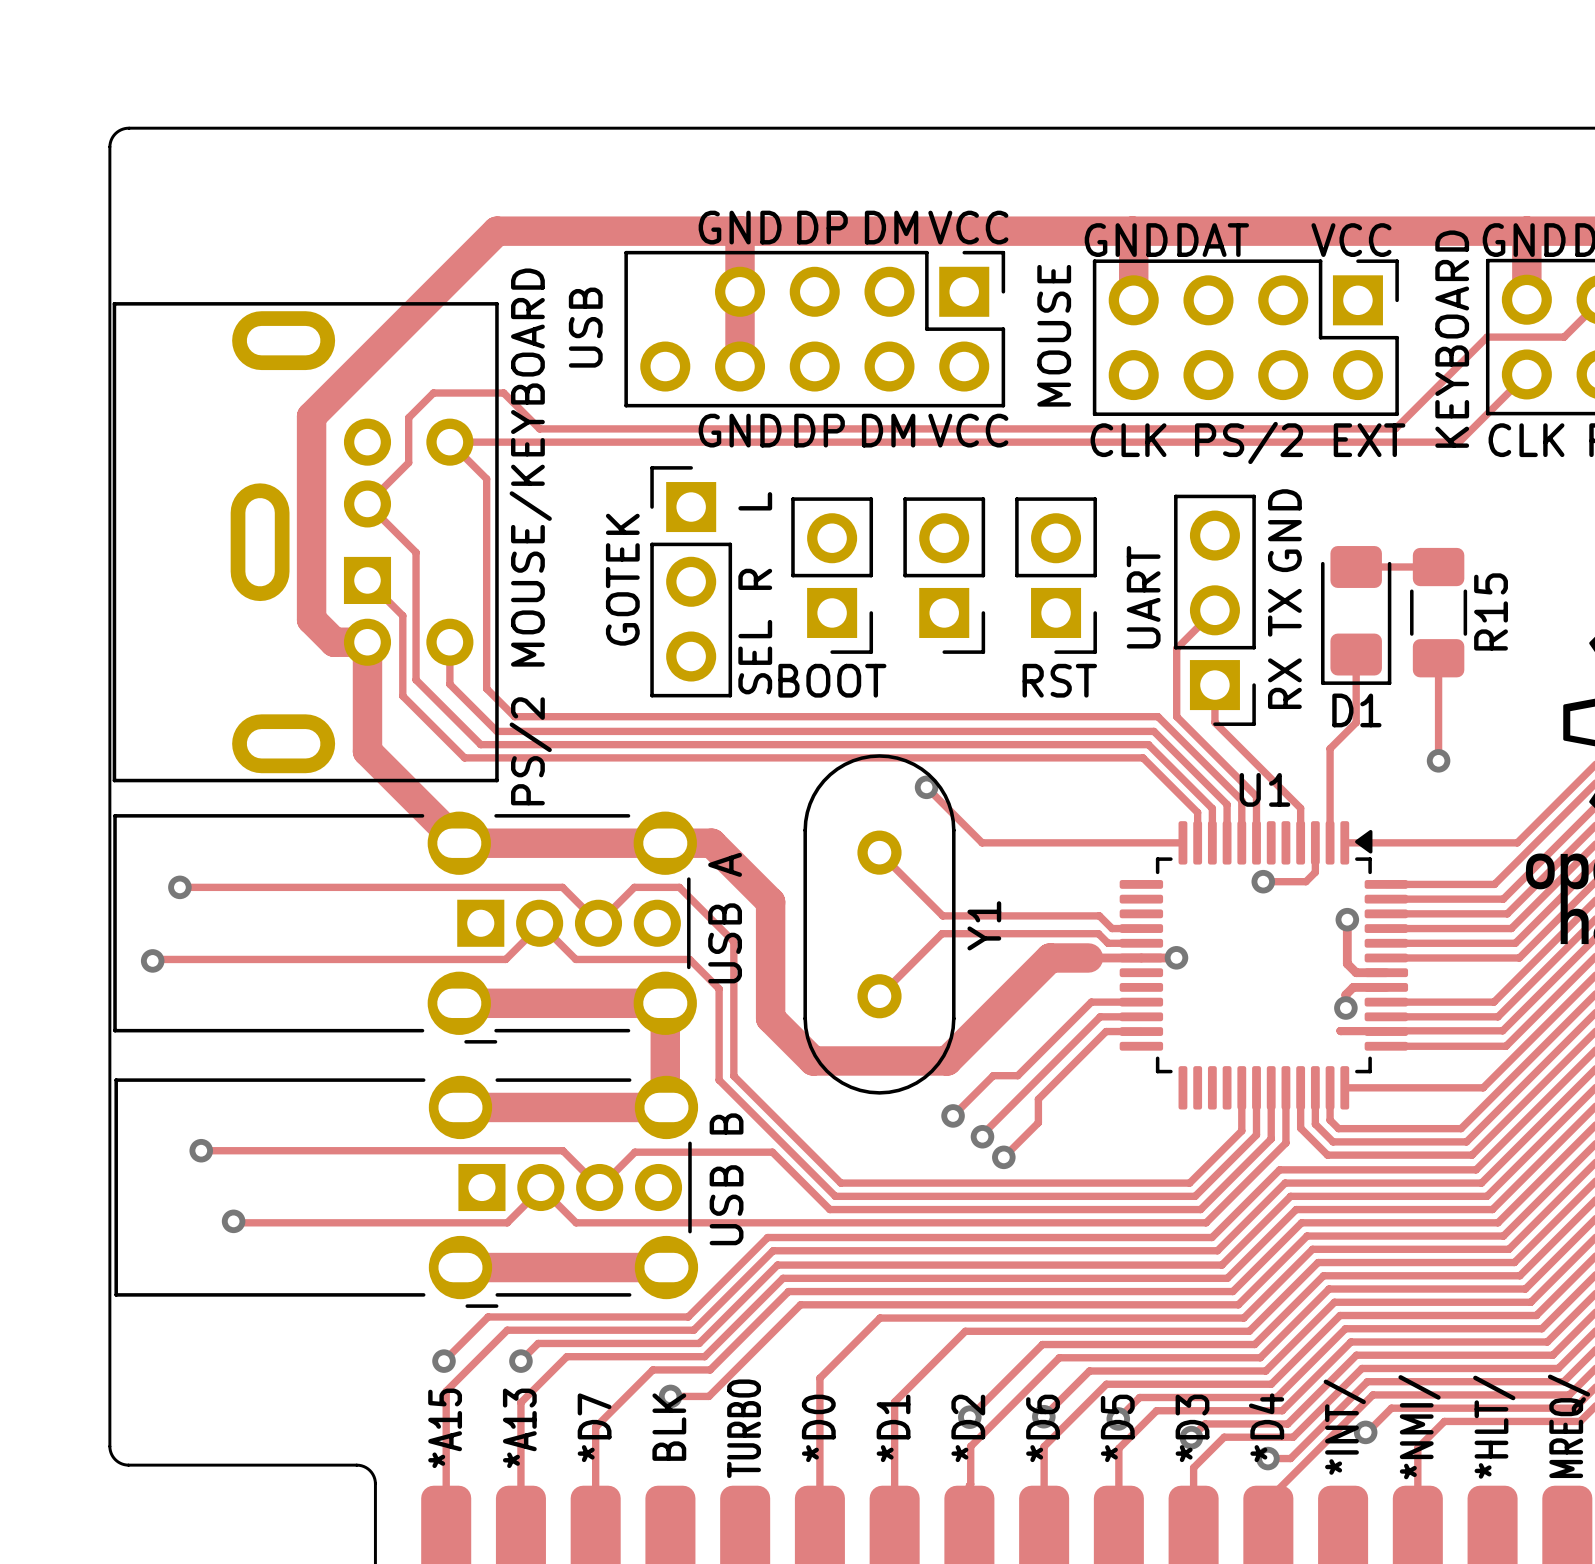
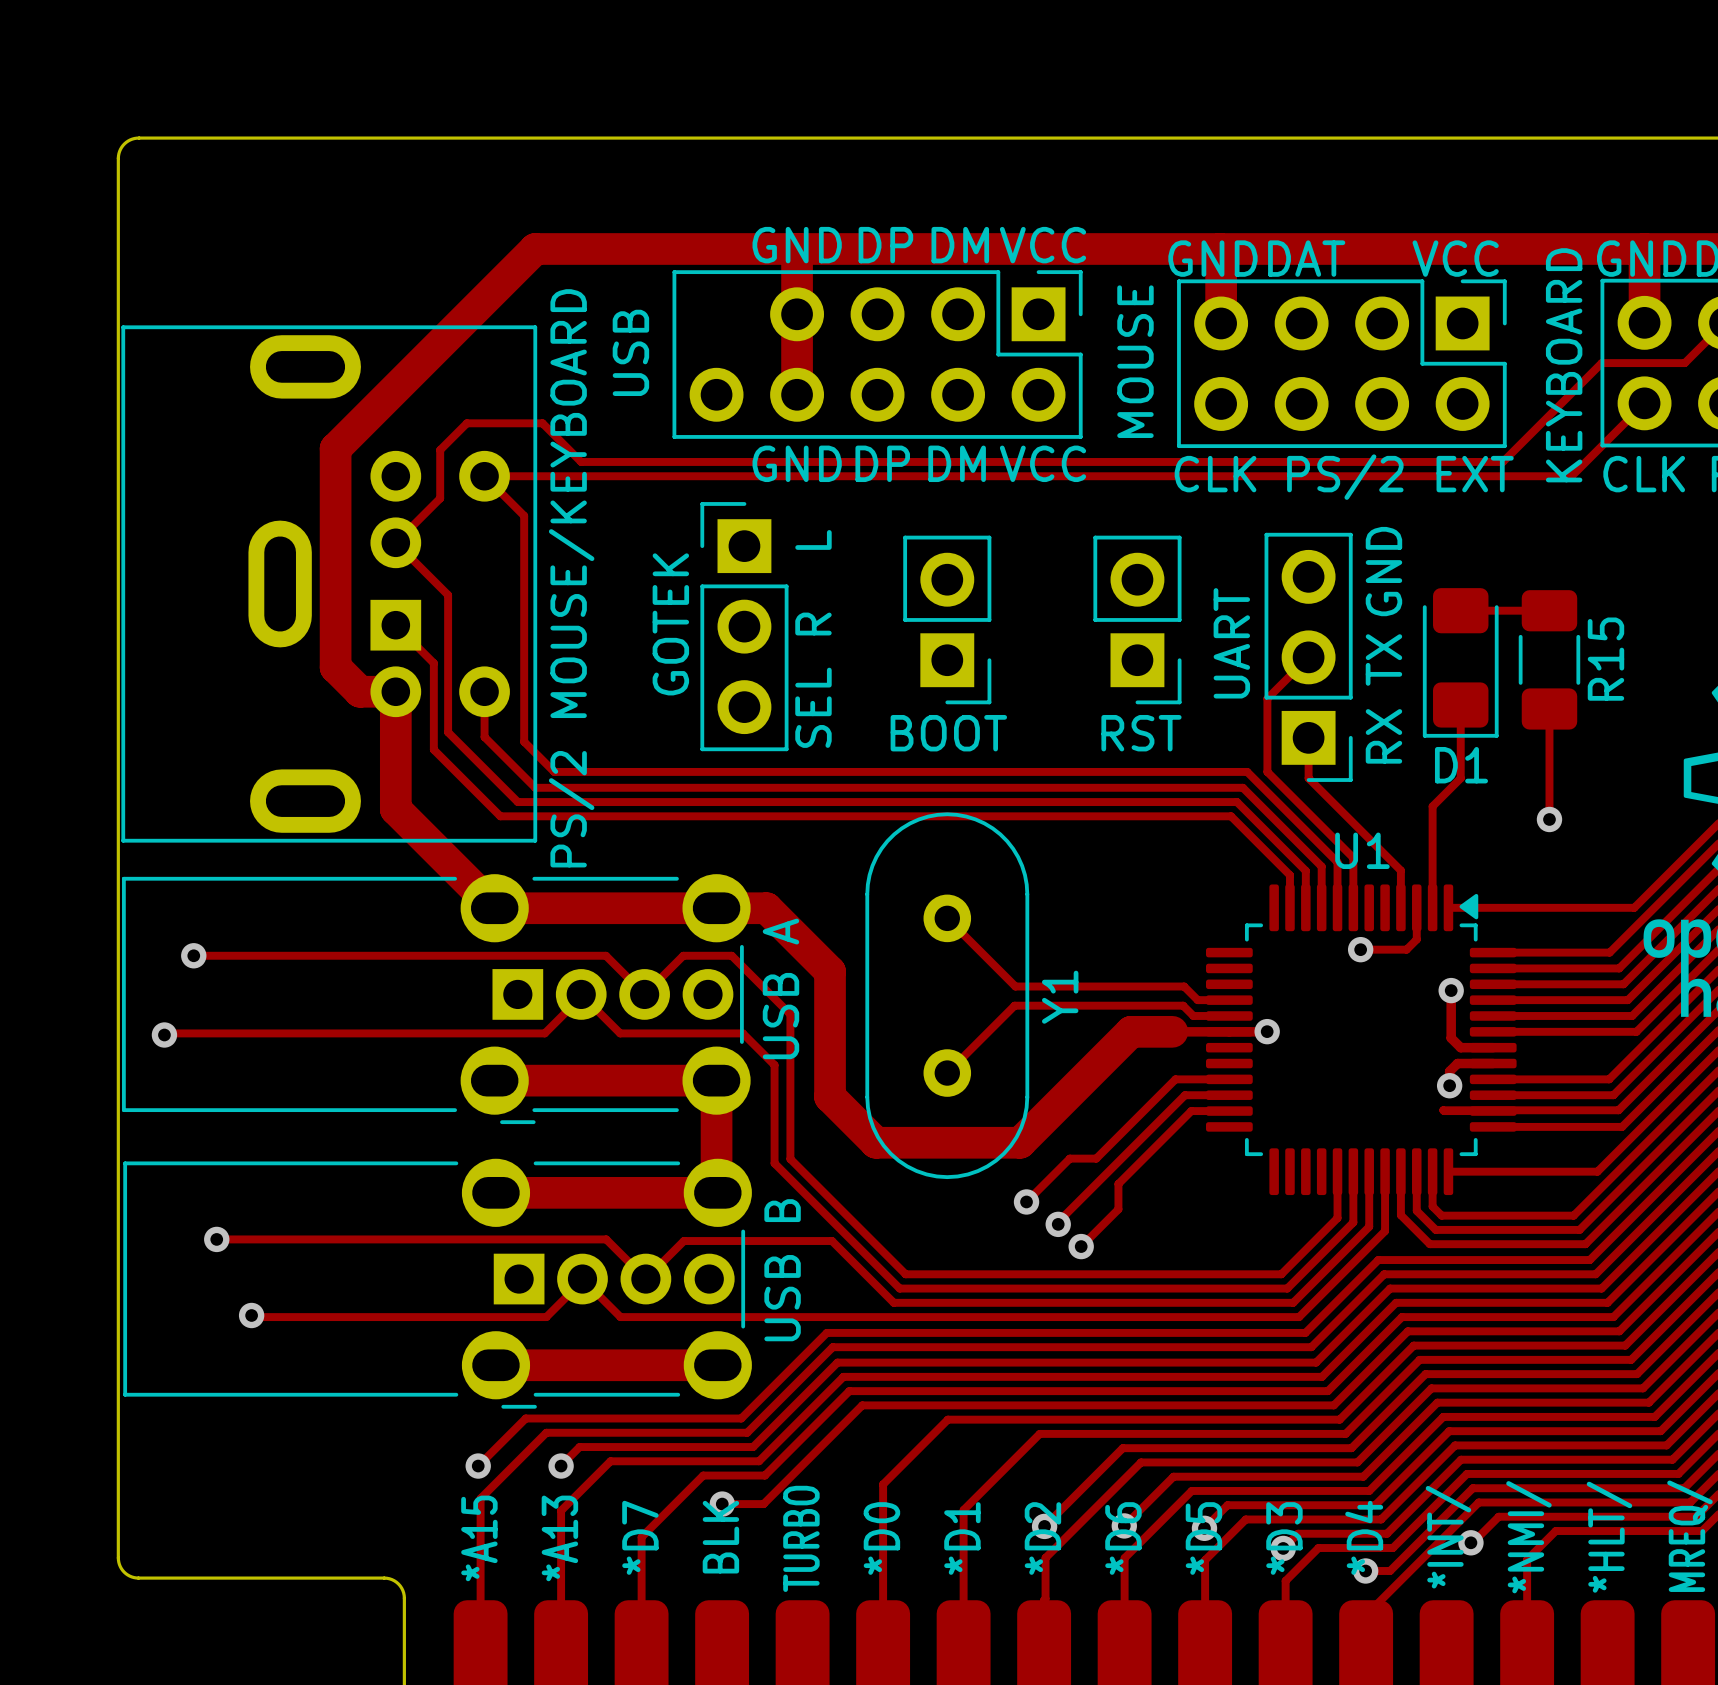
part: (832, 575) -> none
part: none -> (947, 619)
part: (944, 575) -> none
text position: BOOT (832, 680) -> BOOT (948, 733)
track: (926, 787) (982, 842) (1182, 842) -> none
via: (926, 787) -> none

